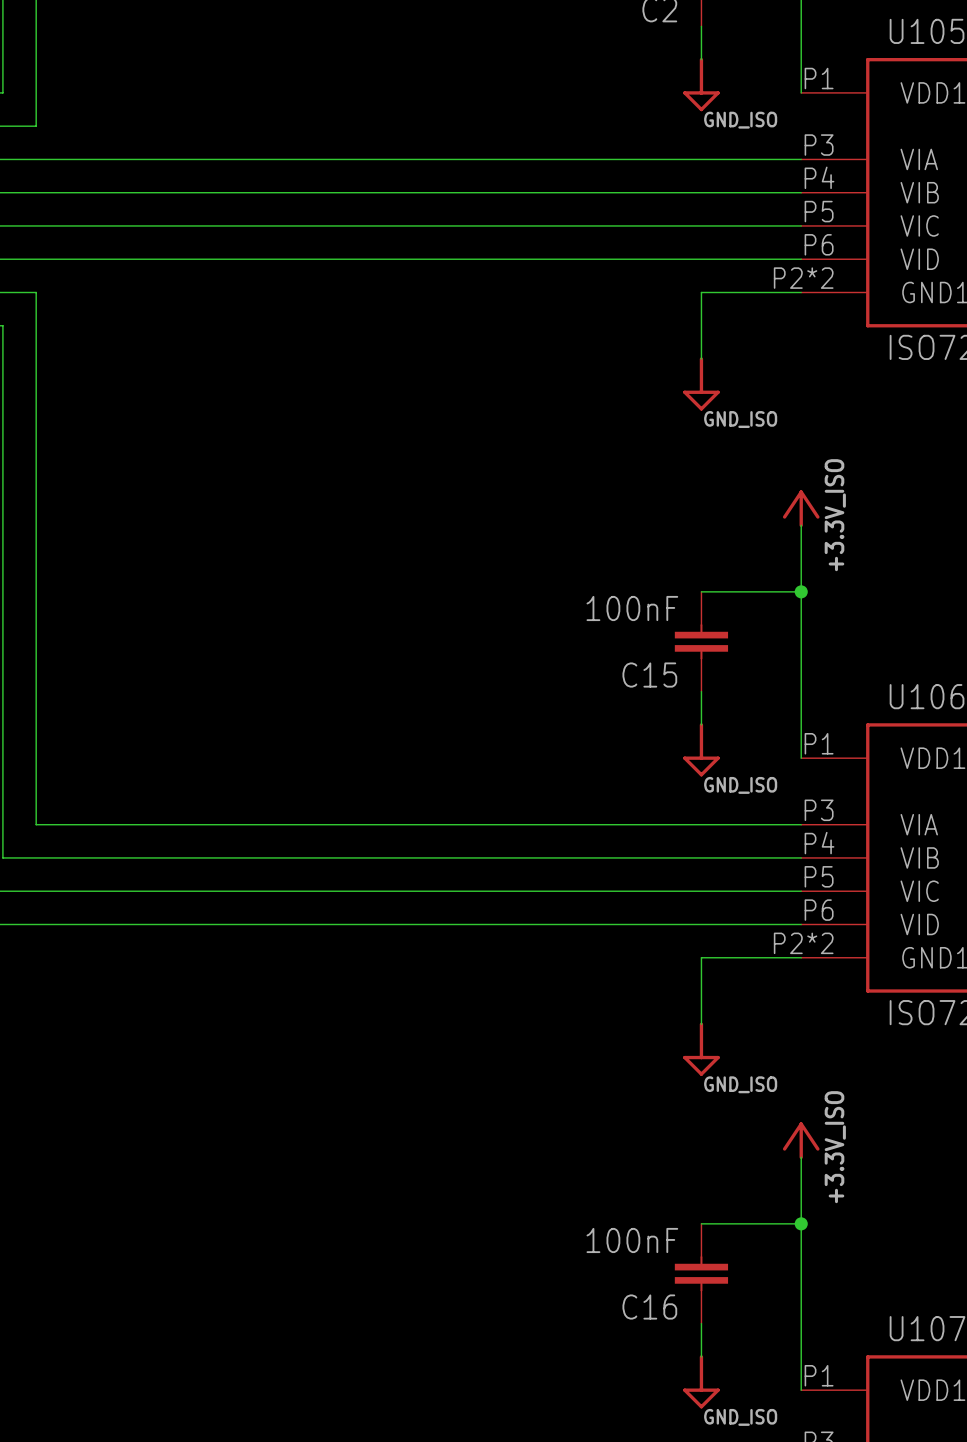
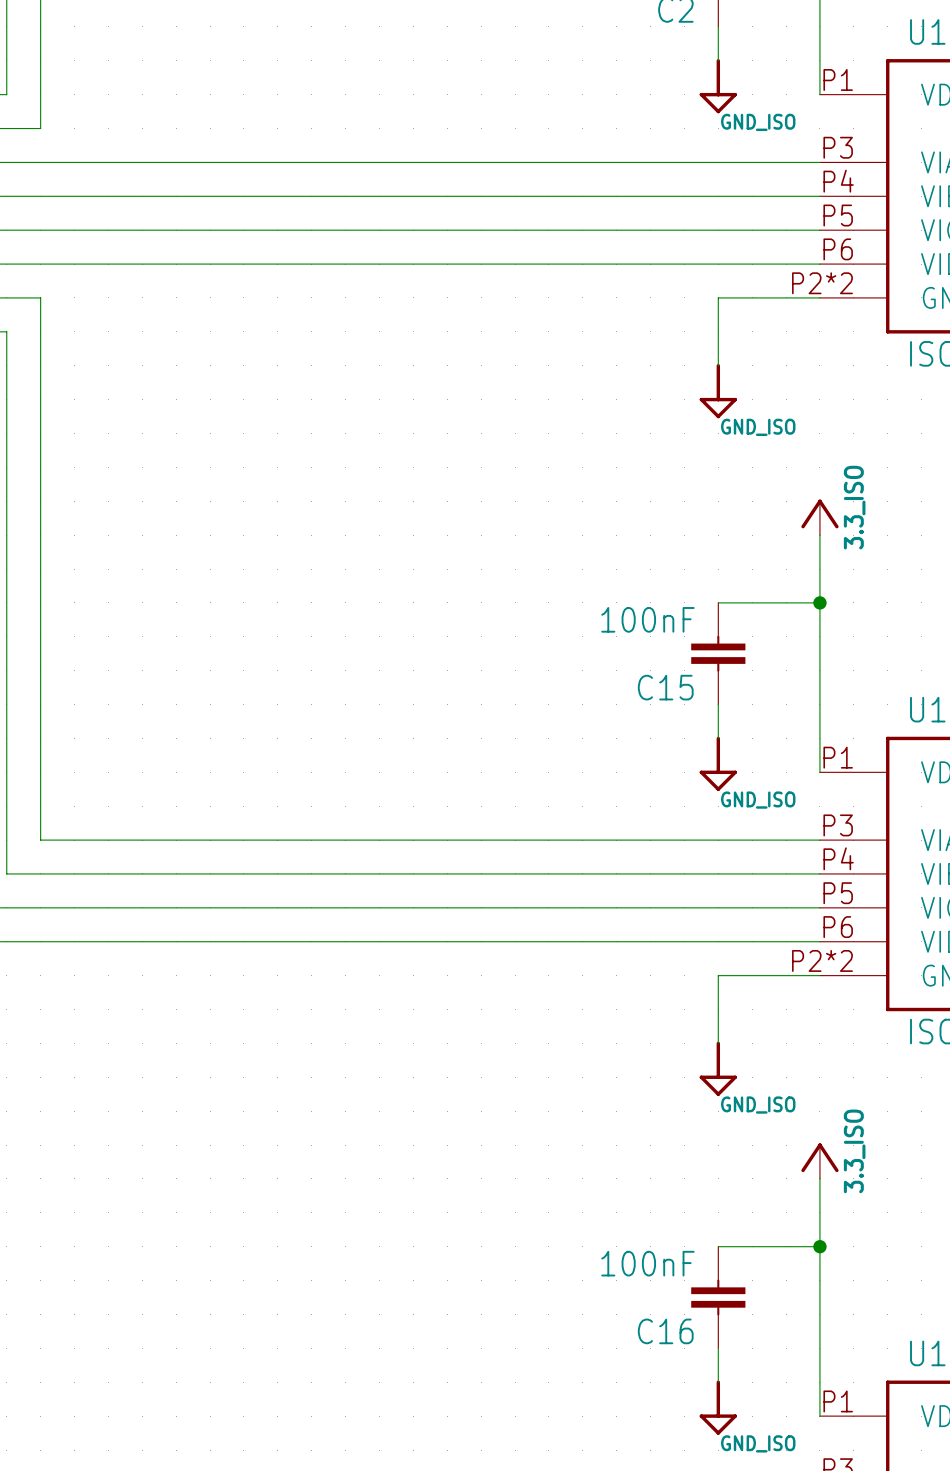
power symbol: none -> (819, 517)
part: +3.3V_ISO (801, 508) -> none
power symbol: none -> (819, 1161)
part: +3.3V_ISO (801, 1140) -> none

